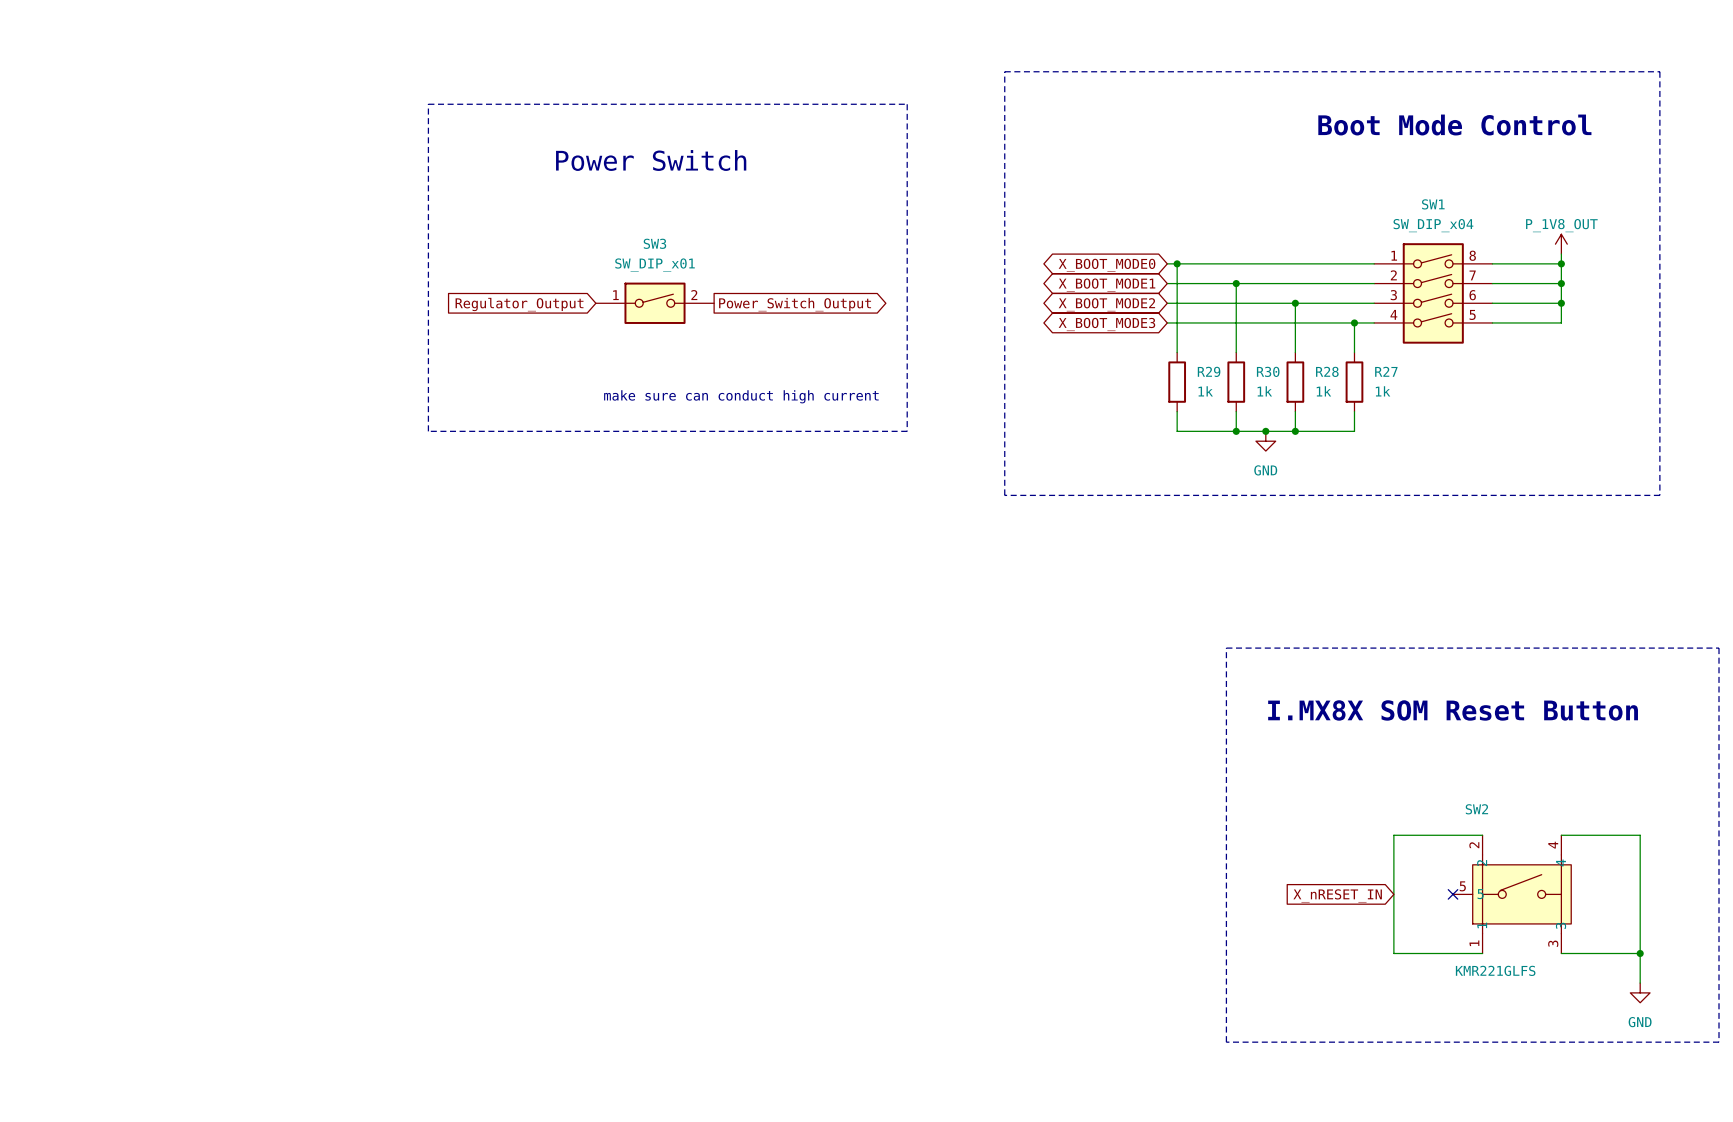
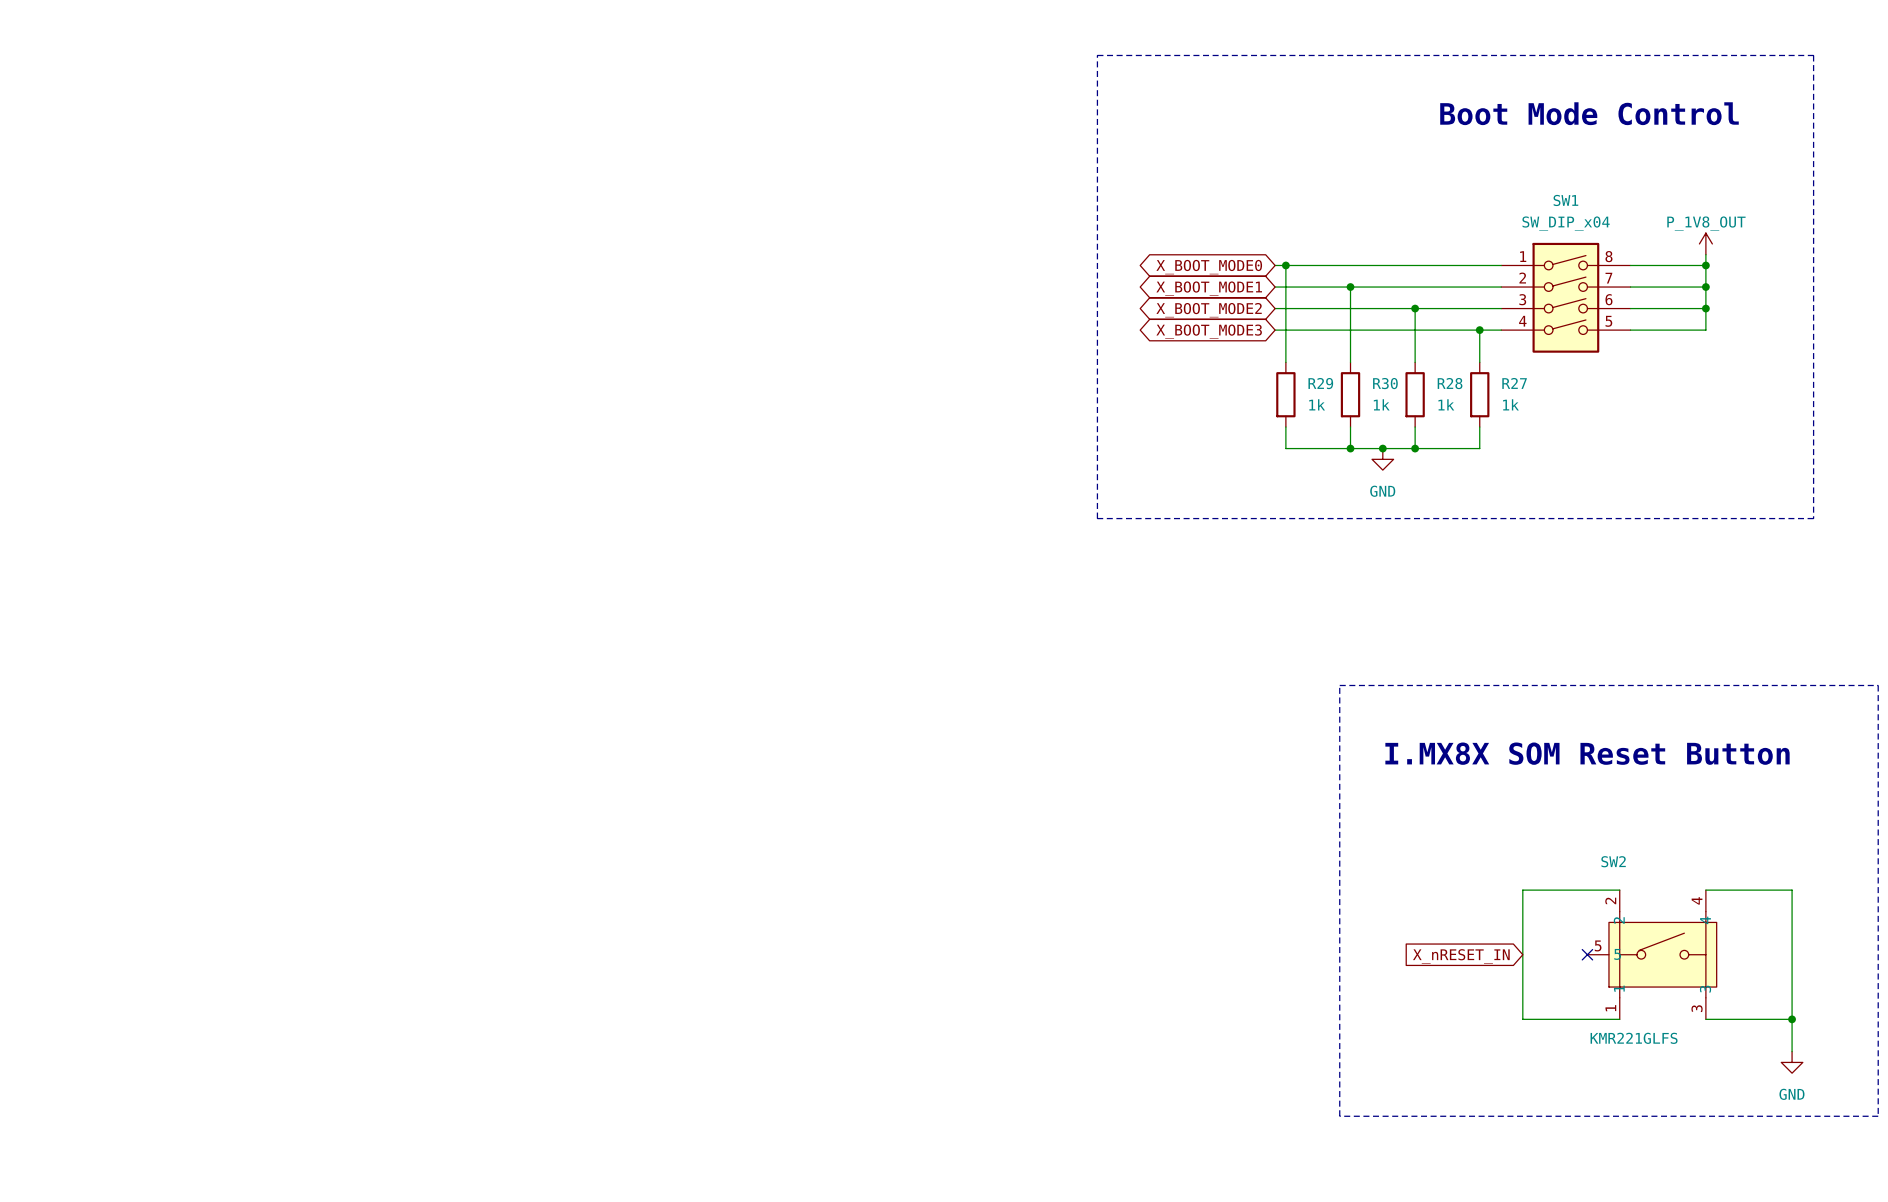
line: (428, 104) (907, 104) (907, 431) (428, 431) (428, 104) -> none
text: Power Switch (651, 160) -> none
SW3: SW_DIP_x01 (655, 303) -> none
global label: Regulator_Output (519, 304) -> none
global label: Power_Switch_Output (795, 304) -> none
text: make sure can conduct high current (741, 396) -> none

